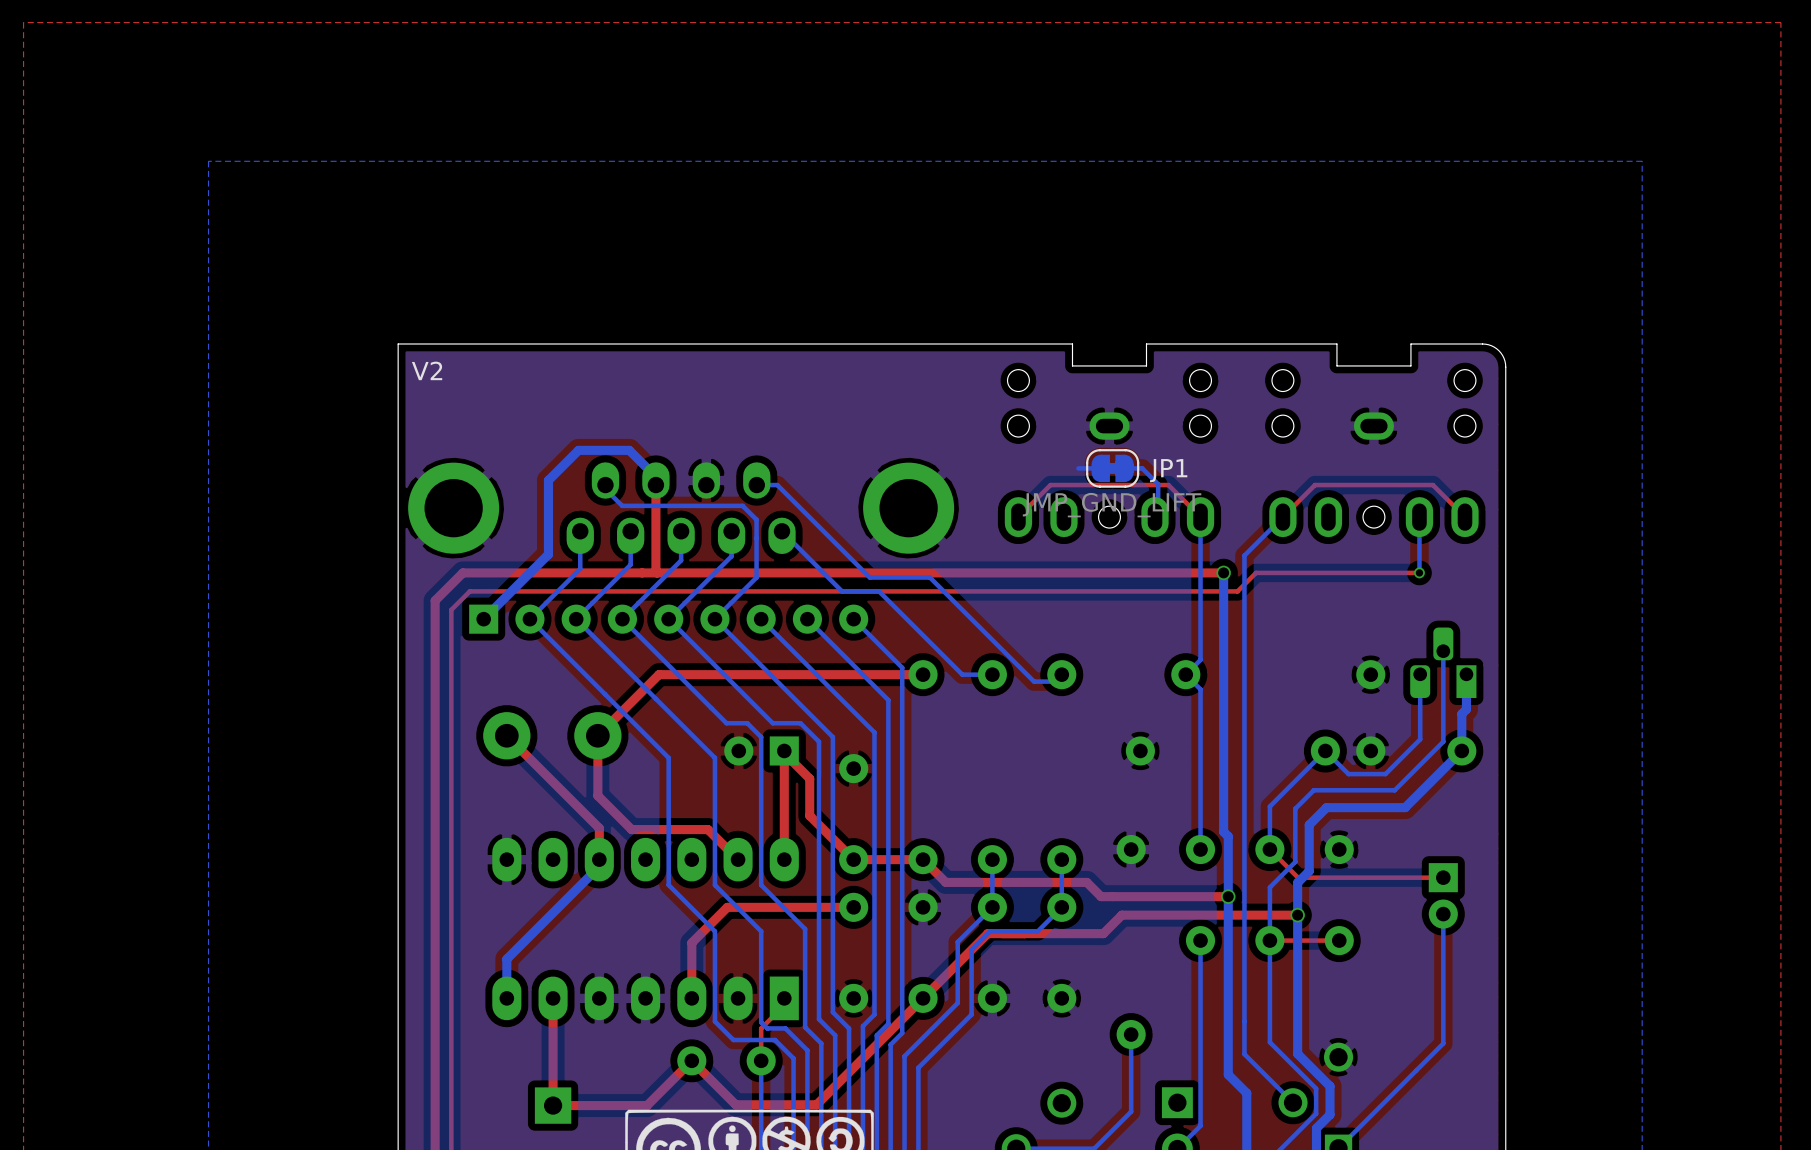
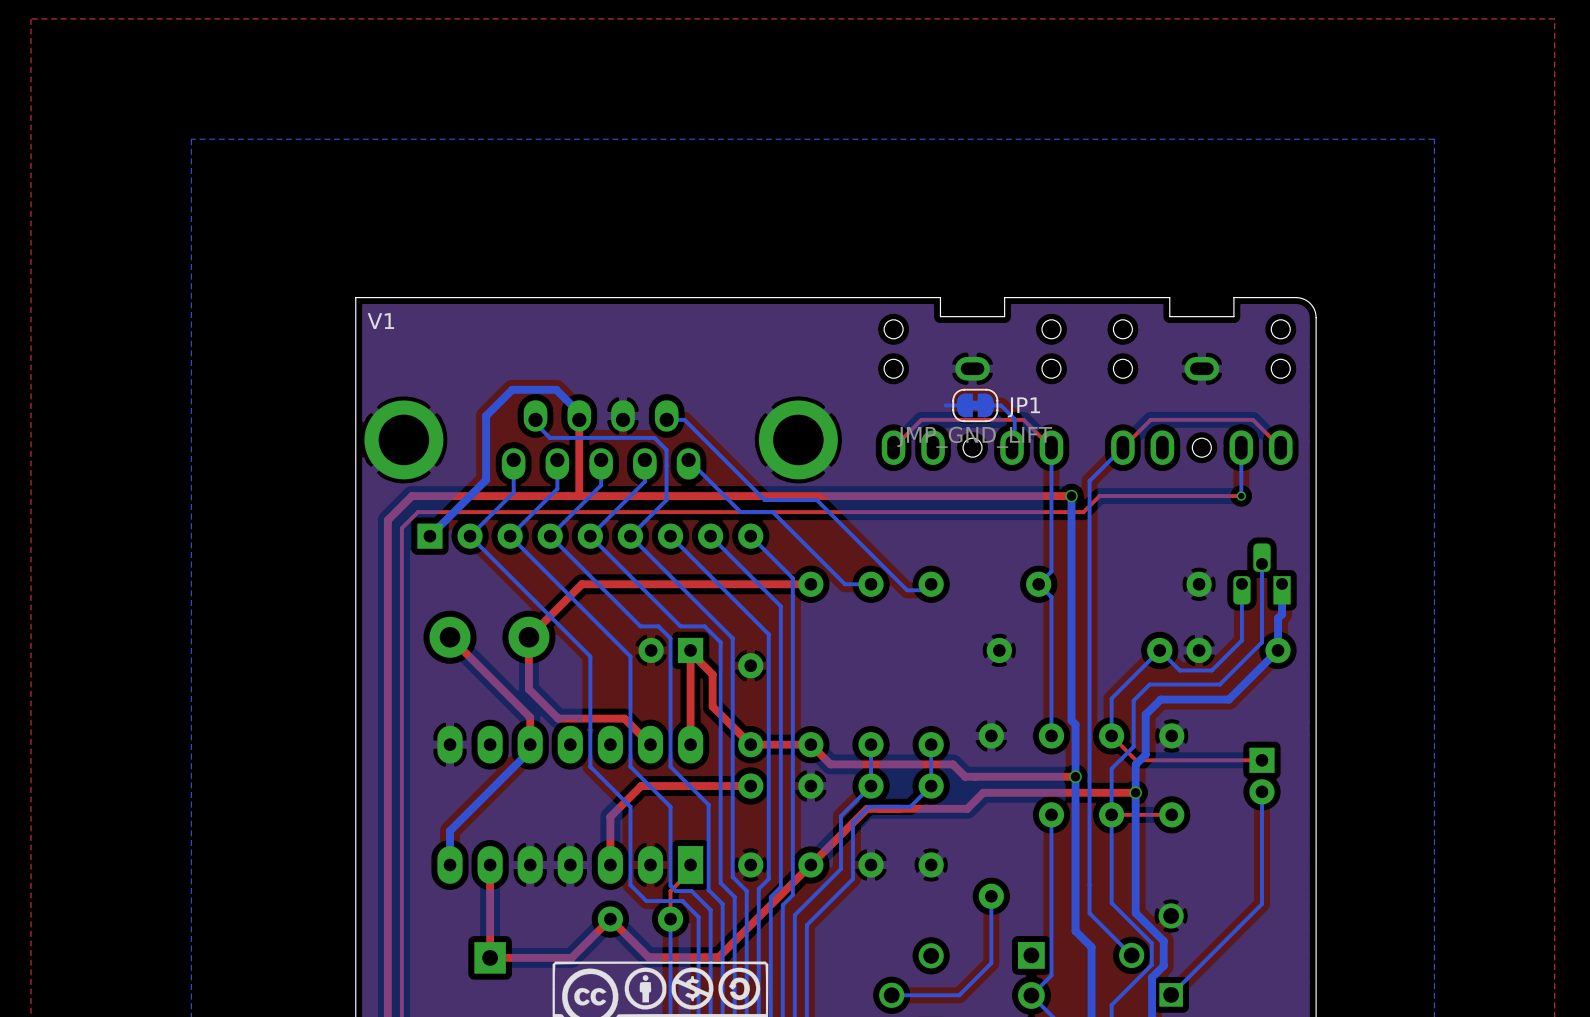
text: V2 (427, 370) -> V1 (380, 321)

